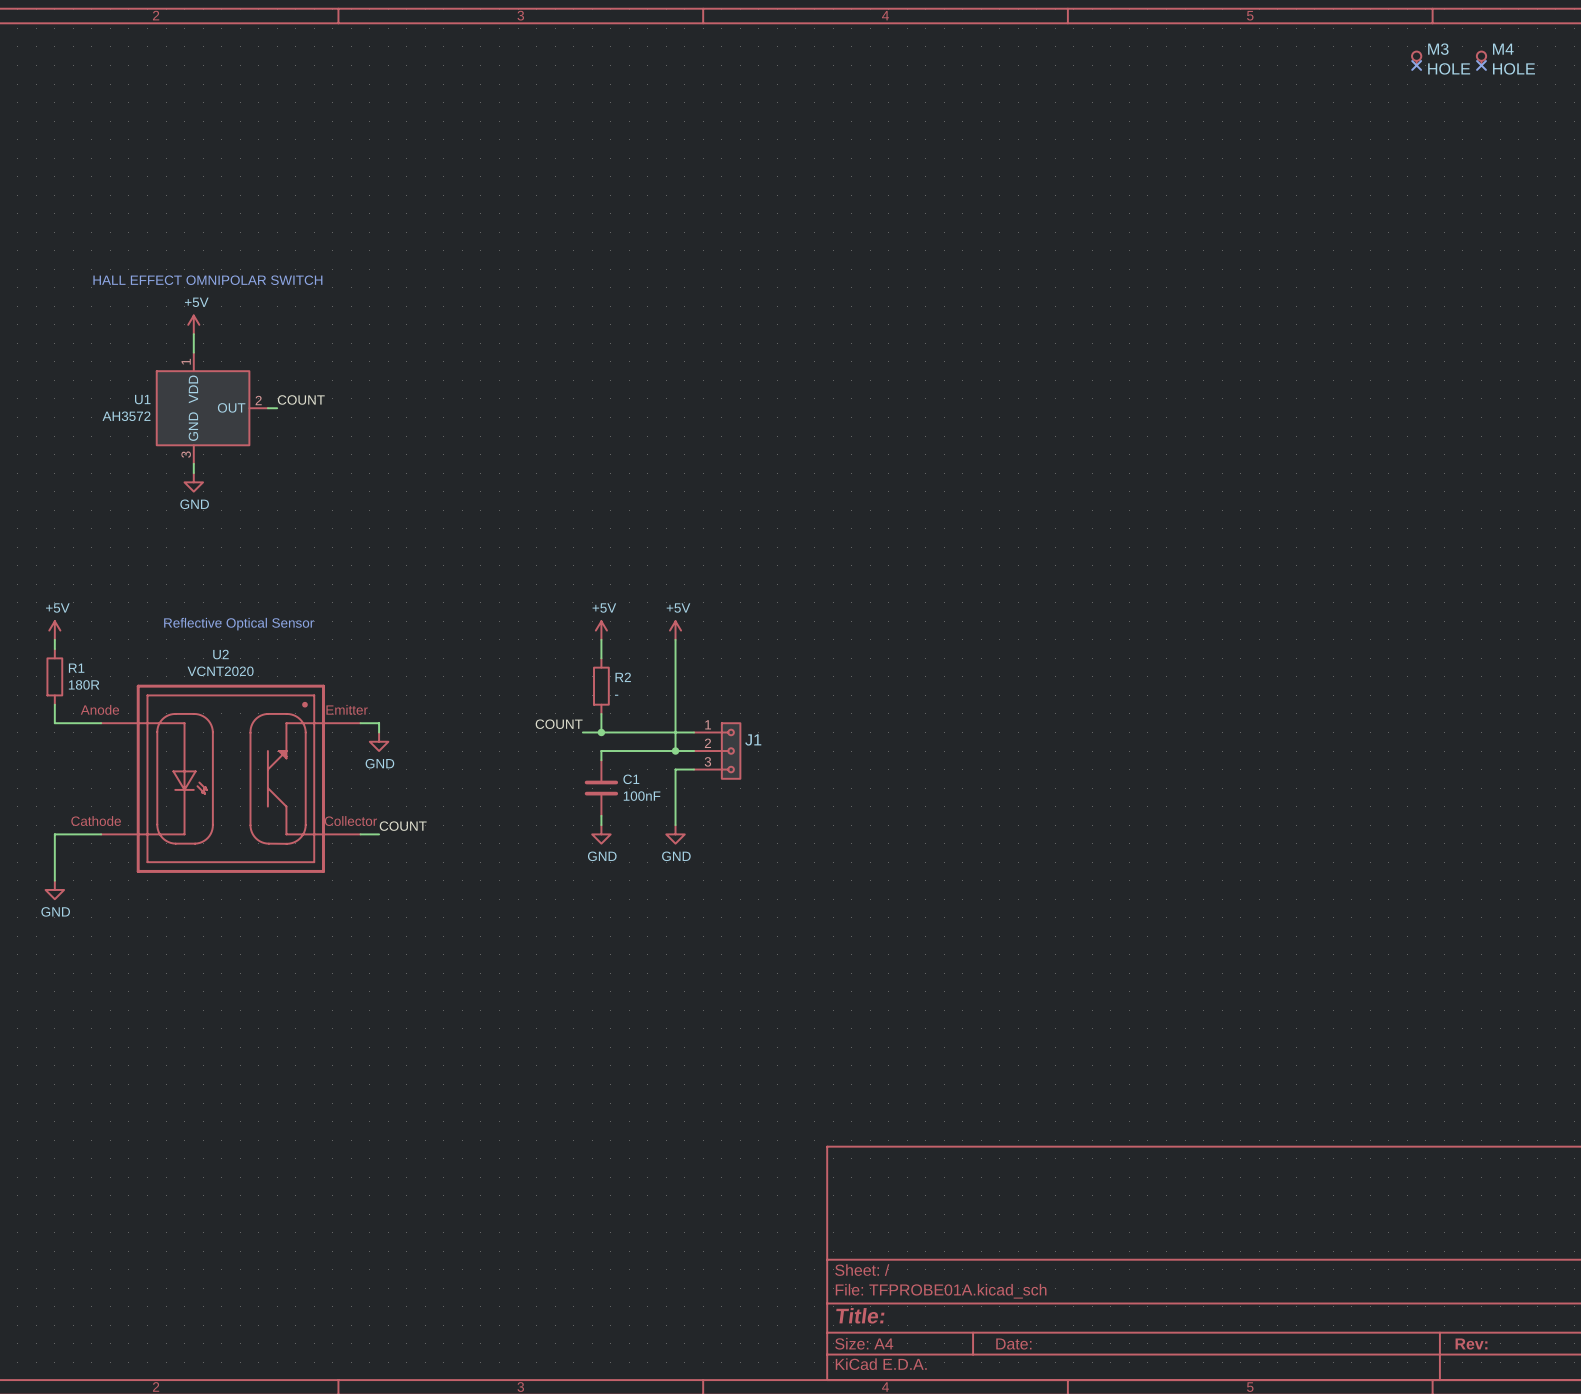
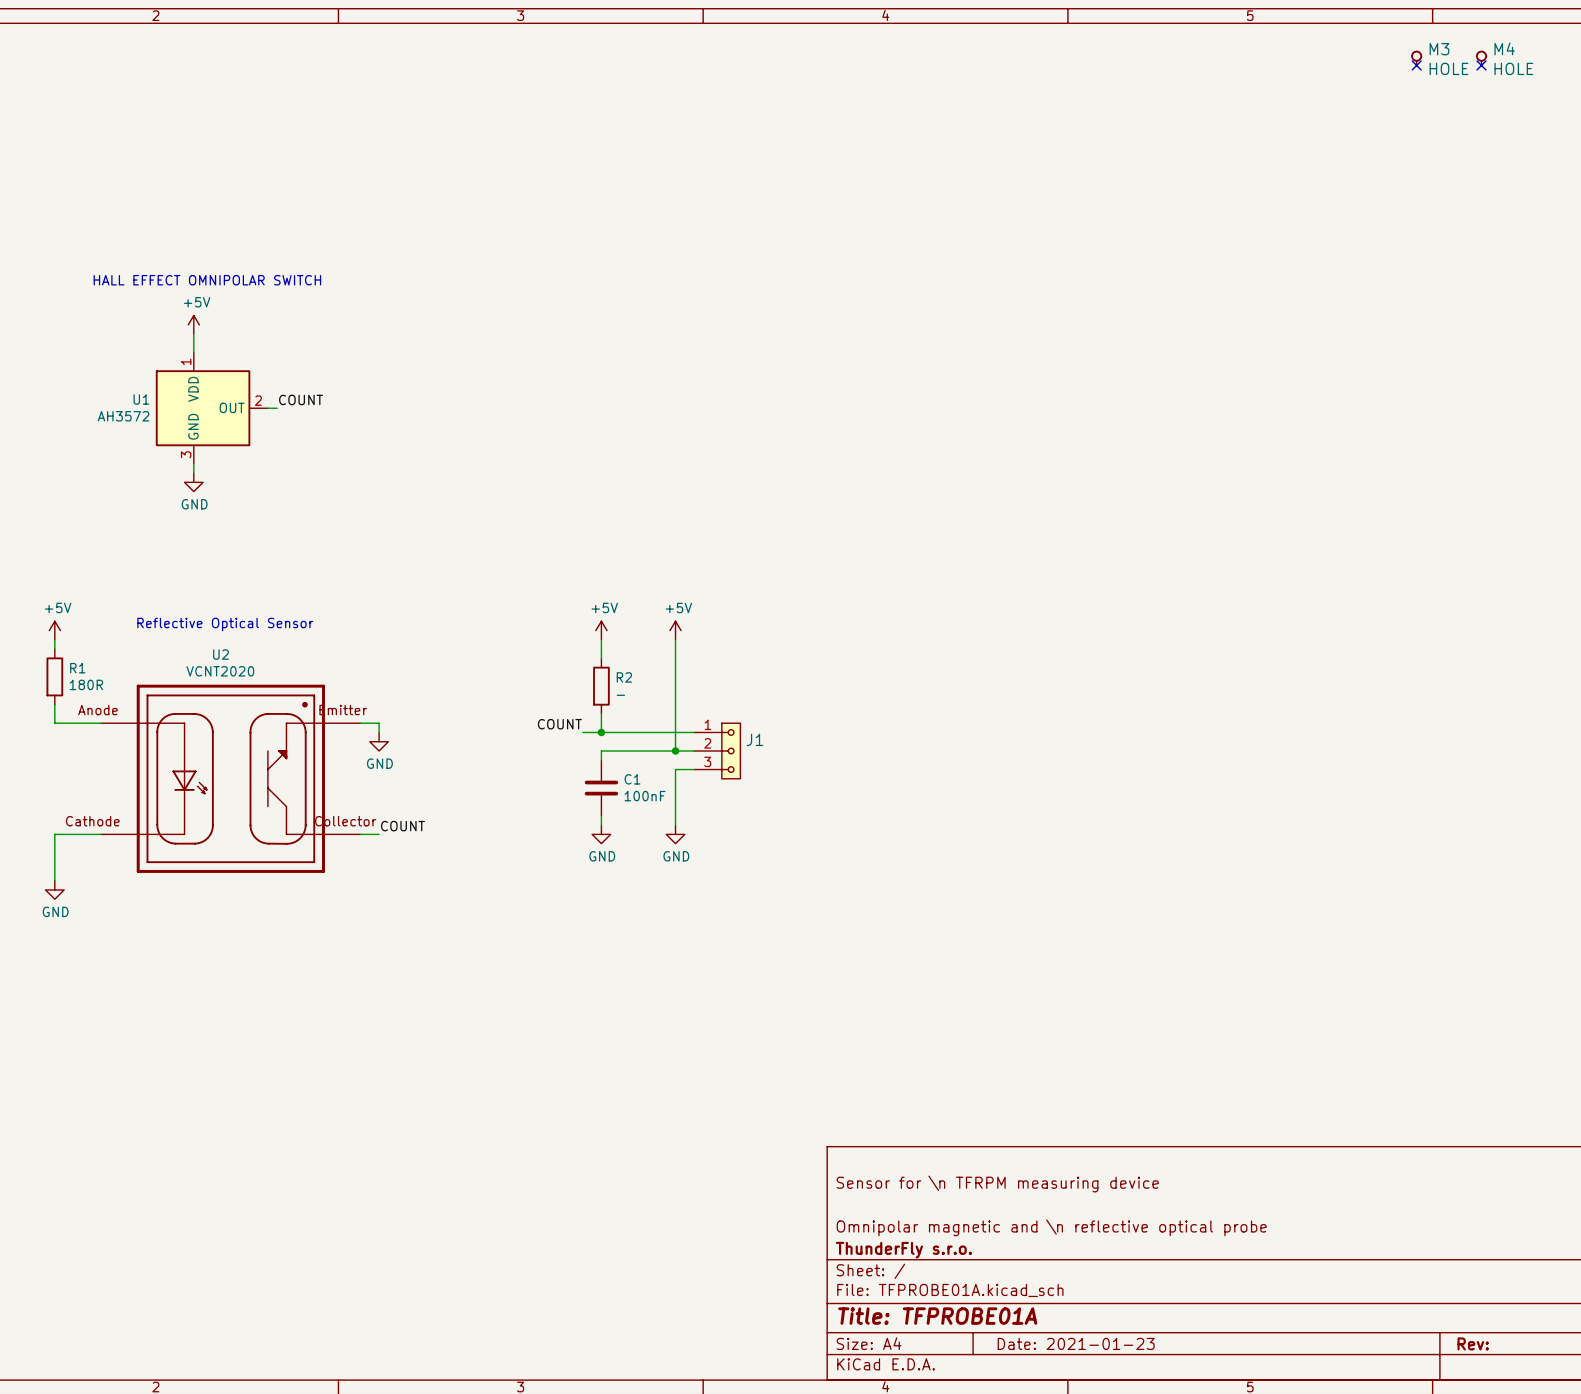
title block: none -> Sensor for \n TFRPM measuring device (997, 1184)
title block: none -> Omnipolar magnetic and \n reflective optical probe (1051, 1227)
title block: none -> ThunderFly s.r.o. (903, 1250)
title block: Title: (860, 1315) -> Title: TFPROBE01A (937, 1316)
title block: Date: (1013, 1344) -> Date: 2021-01-23 (1076, 1343)

